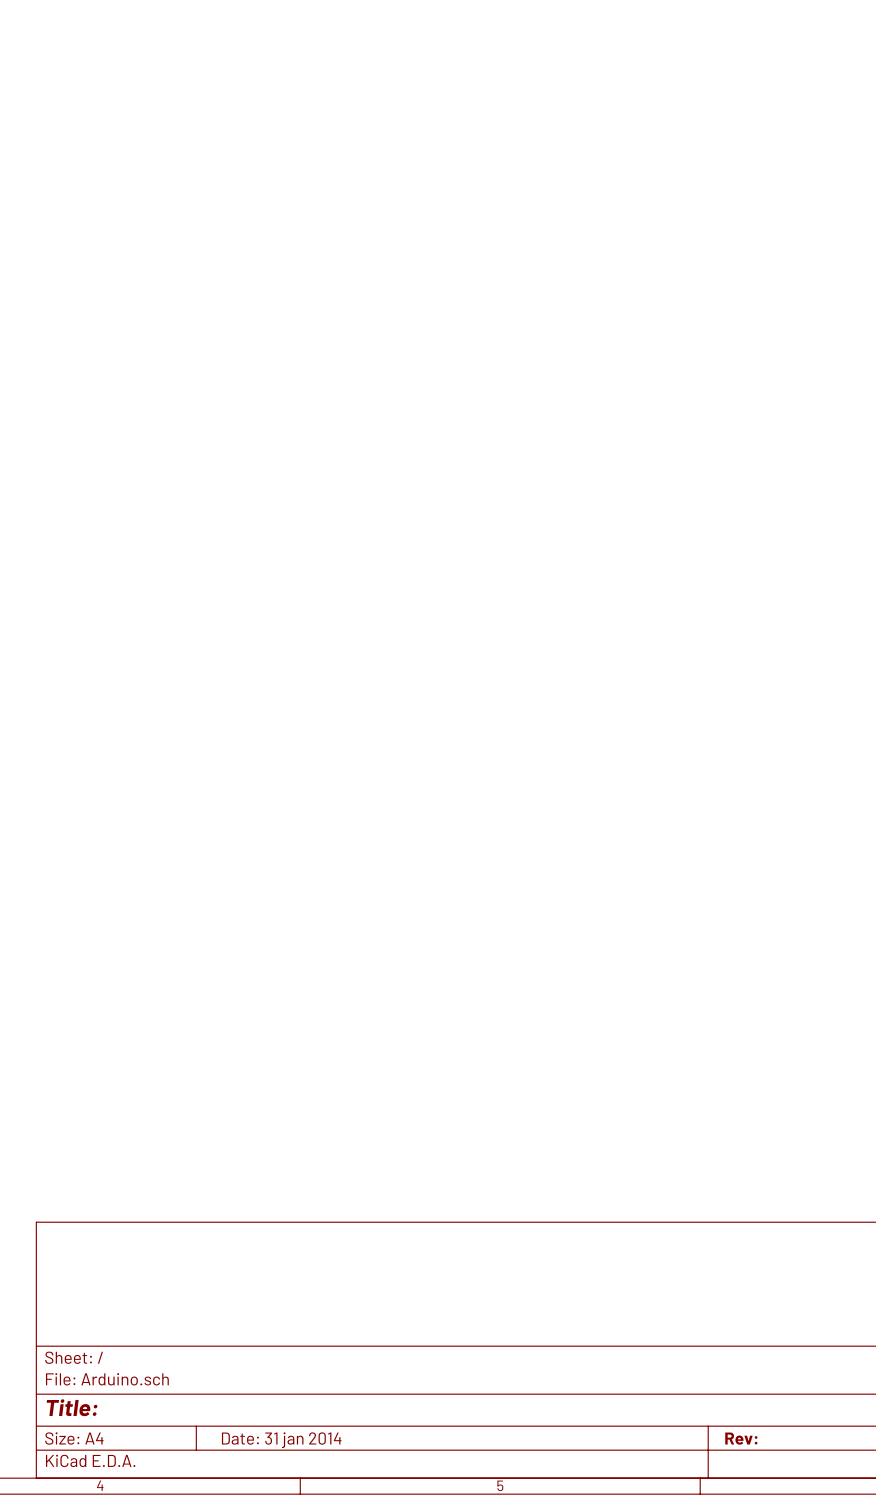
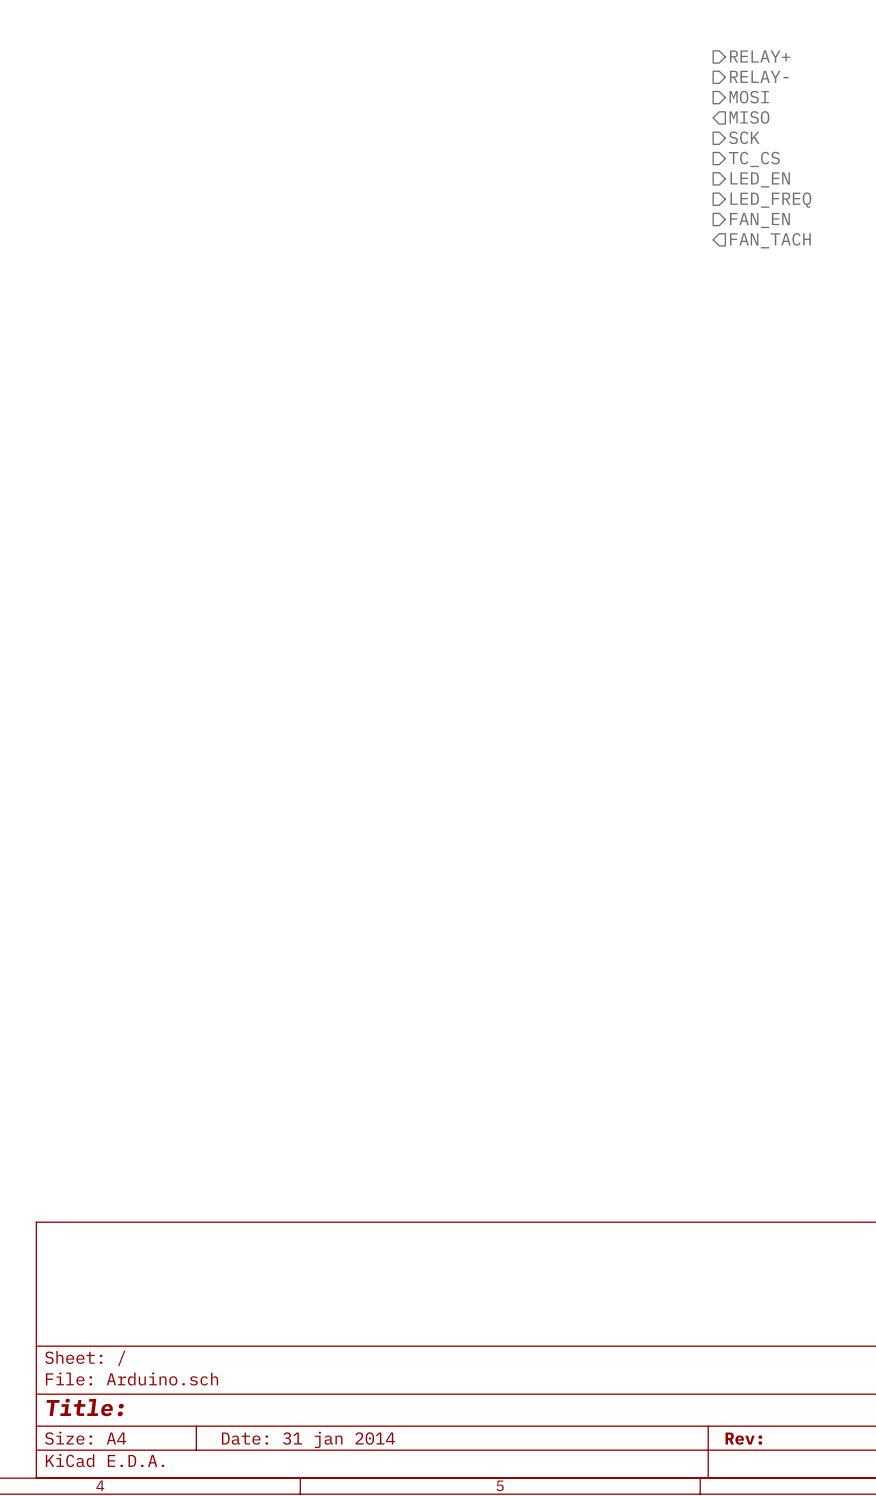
hierarchical label: none -> RELAY+ (760, 56)
hierarchical label: none -> RELAY- (759, 76)
hierarchical label: none -> MOSI (749, 97)
hierarchical label: none -> MISO (749, 117)
hierarchical label: none -> SCK (744, 137)
hierarchical label: none -> TC_CS (754, 159)
hierarchical label: none -> LED_EN (760, 179)
hierarchical label: none -> LED_FREQ (770, 200)
hierarchical label: none -> FAN_EN (759, 220)
hierarchical label: none -> FAN_TACH (770, 240)

